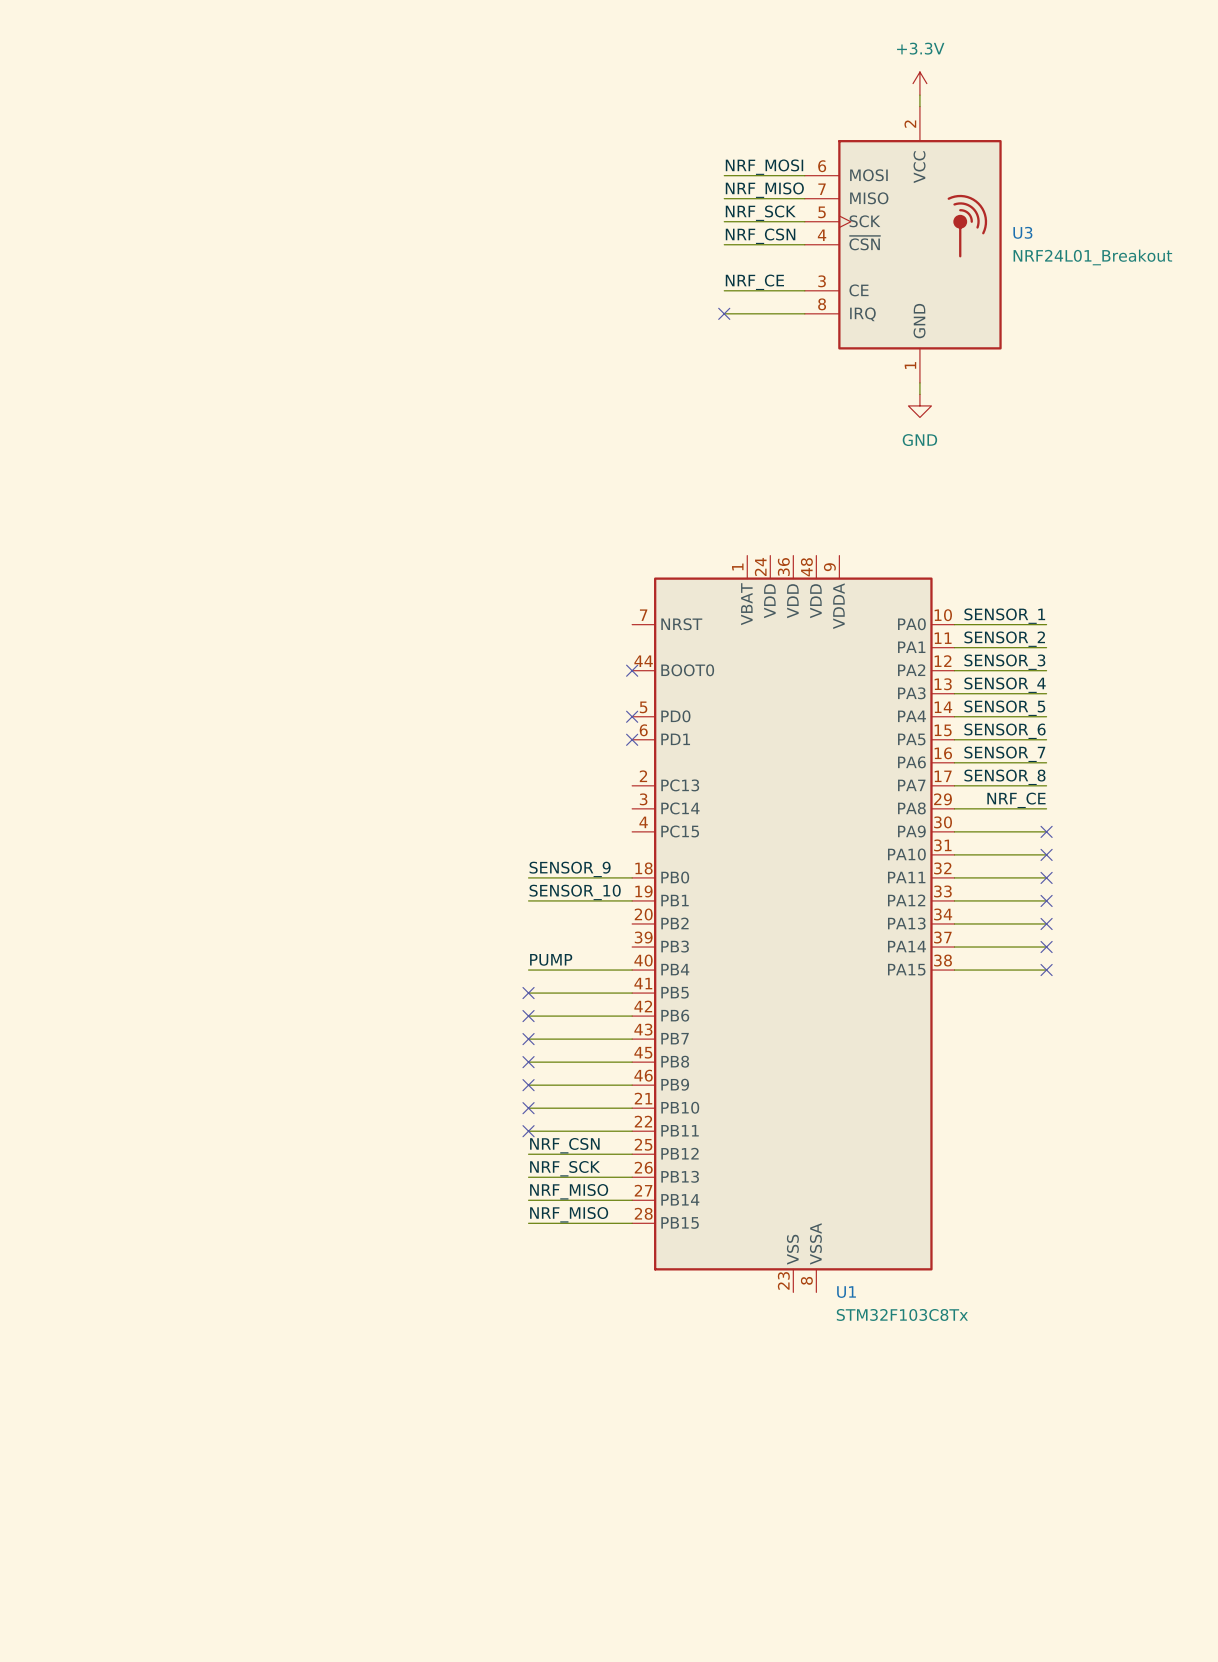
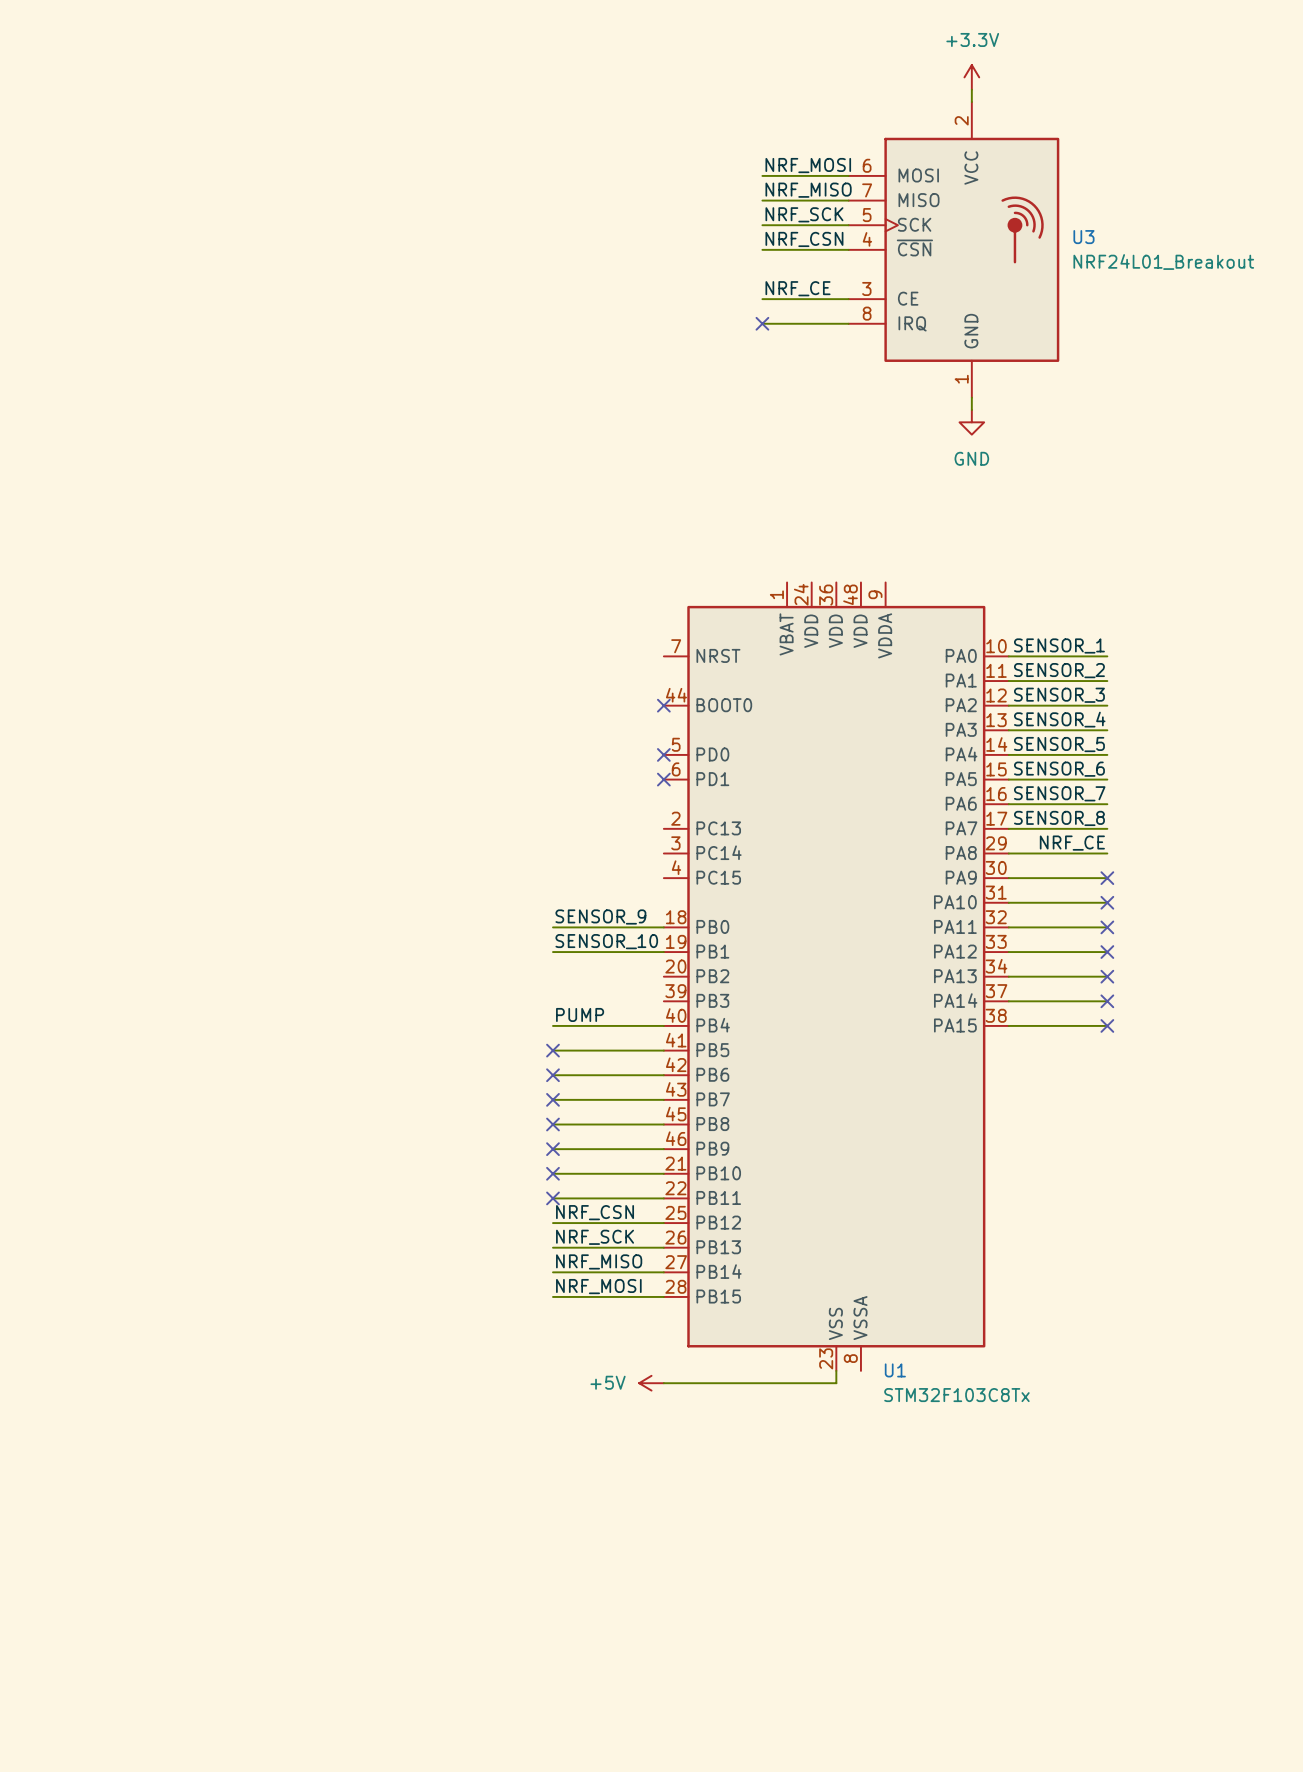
label: NRF_MISO (569, 1214) -> NRF_MOSI (598, 1286)
wire: none -> (836, 1370) (836, 1383) (663, 1383)
power symbol: none -> +5V (651, 1383)

